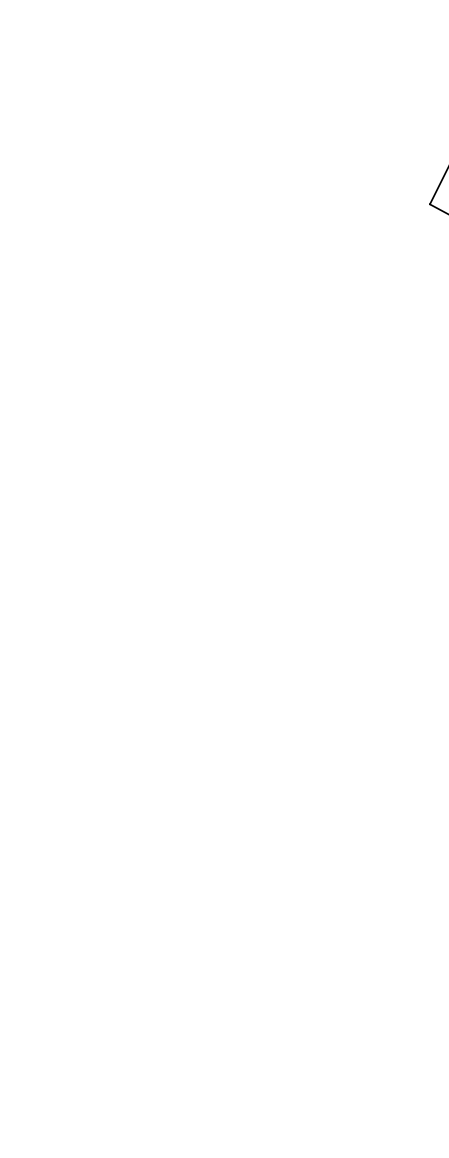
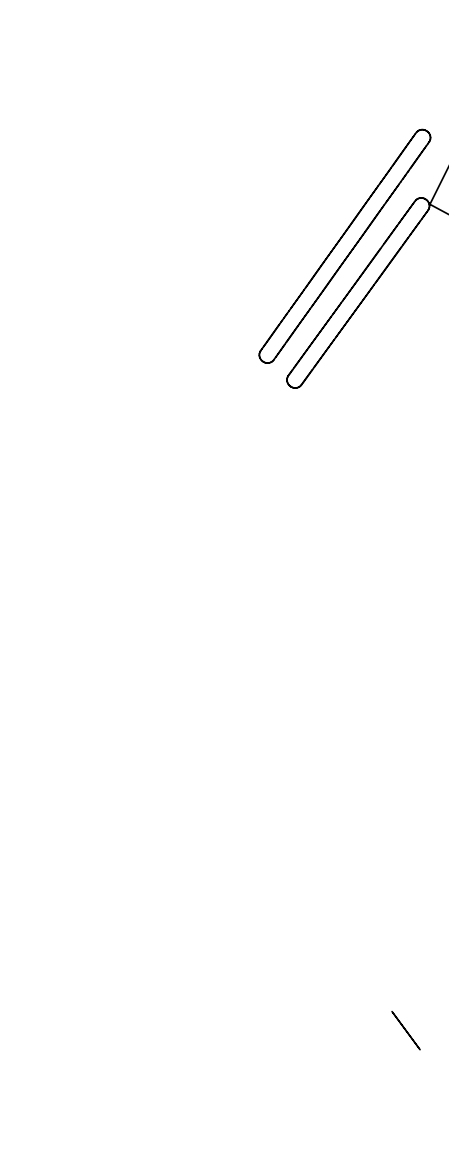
board edge: none -> (422, 129) (429, 133) (429, 141) (273, 359) (269, 362) (263, 361) (259, 356) (260, 350) (415, 134) (422, 129)
board edge: none -> (422, 198) (428, 202) (428, 210) (301, 384) (297, 387) (291, 386) (287, 381) (288, 375) (415, 200) (422, 198)
board edge: none -> (392, 1011) (406, 1030)
board edge: none -> (408, 1033) (420, 1049)

